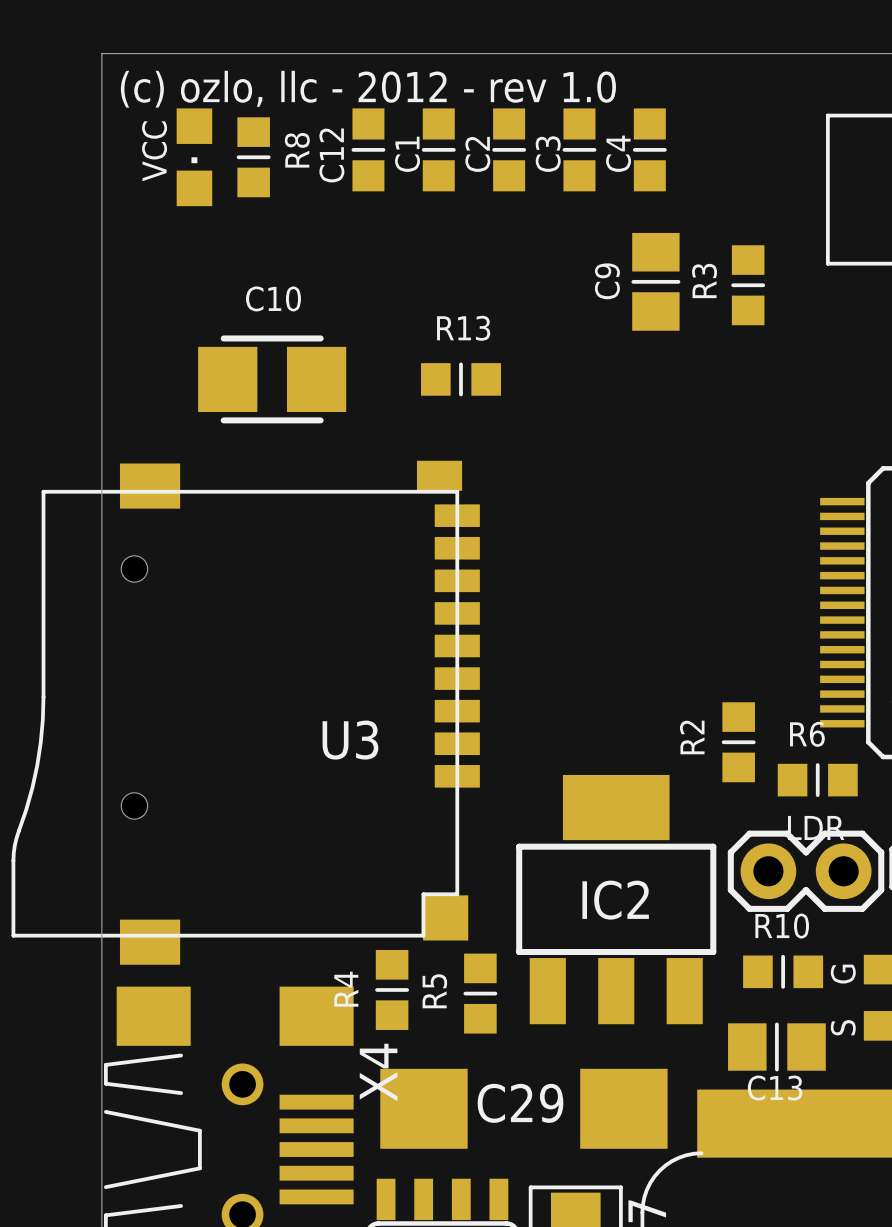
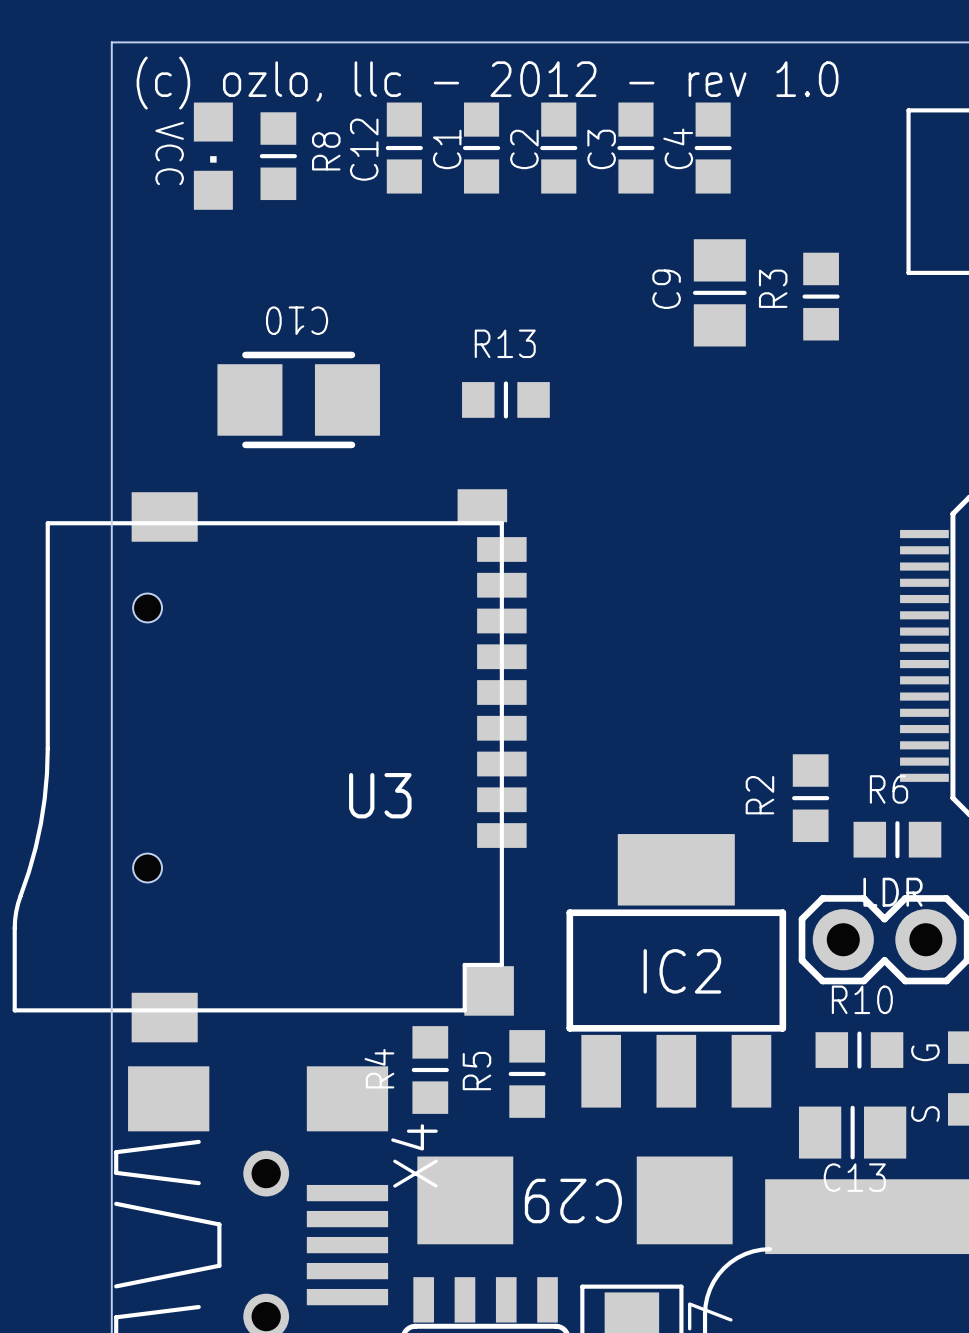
VCC name rotation: 0° (154, 151) -> 180° (169, 153)
C10 name rotation: 0° (273, 298) -> 180° (297, 320)
C29 name rotation: 0° (520, 1103) -> 180° (573, 1200)

